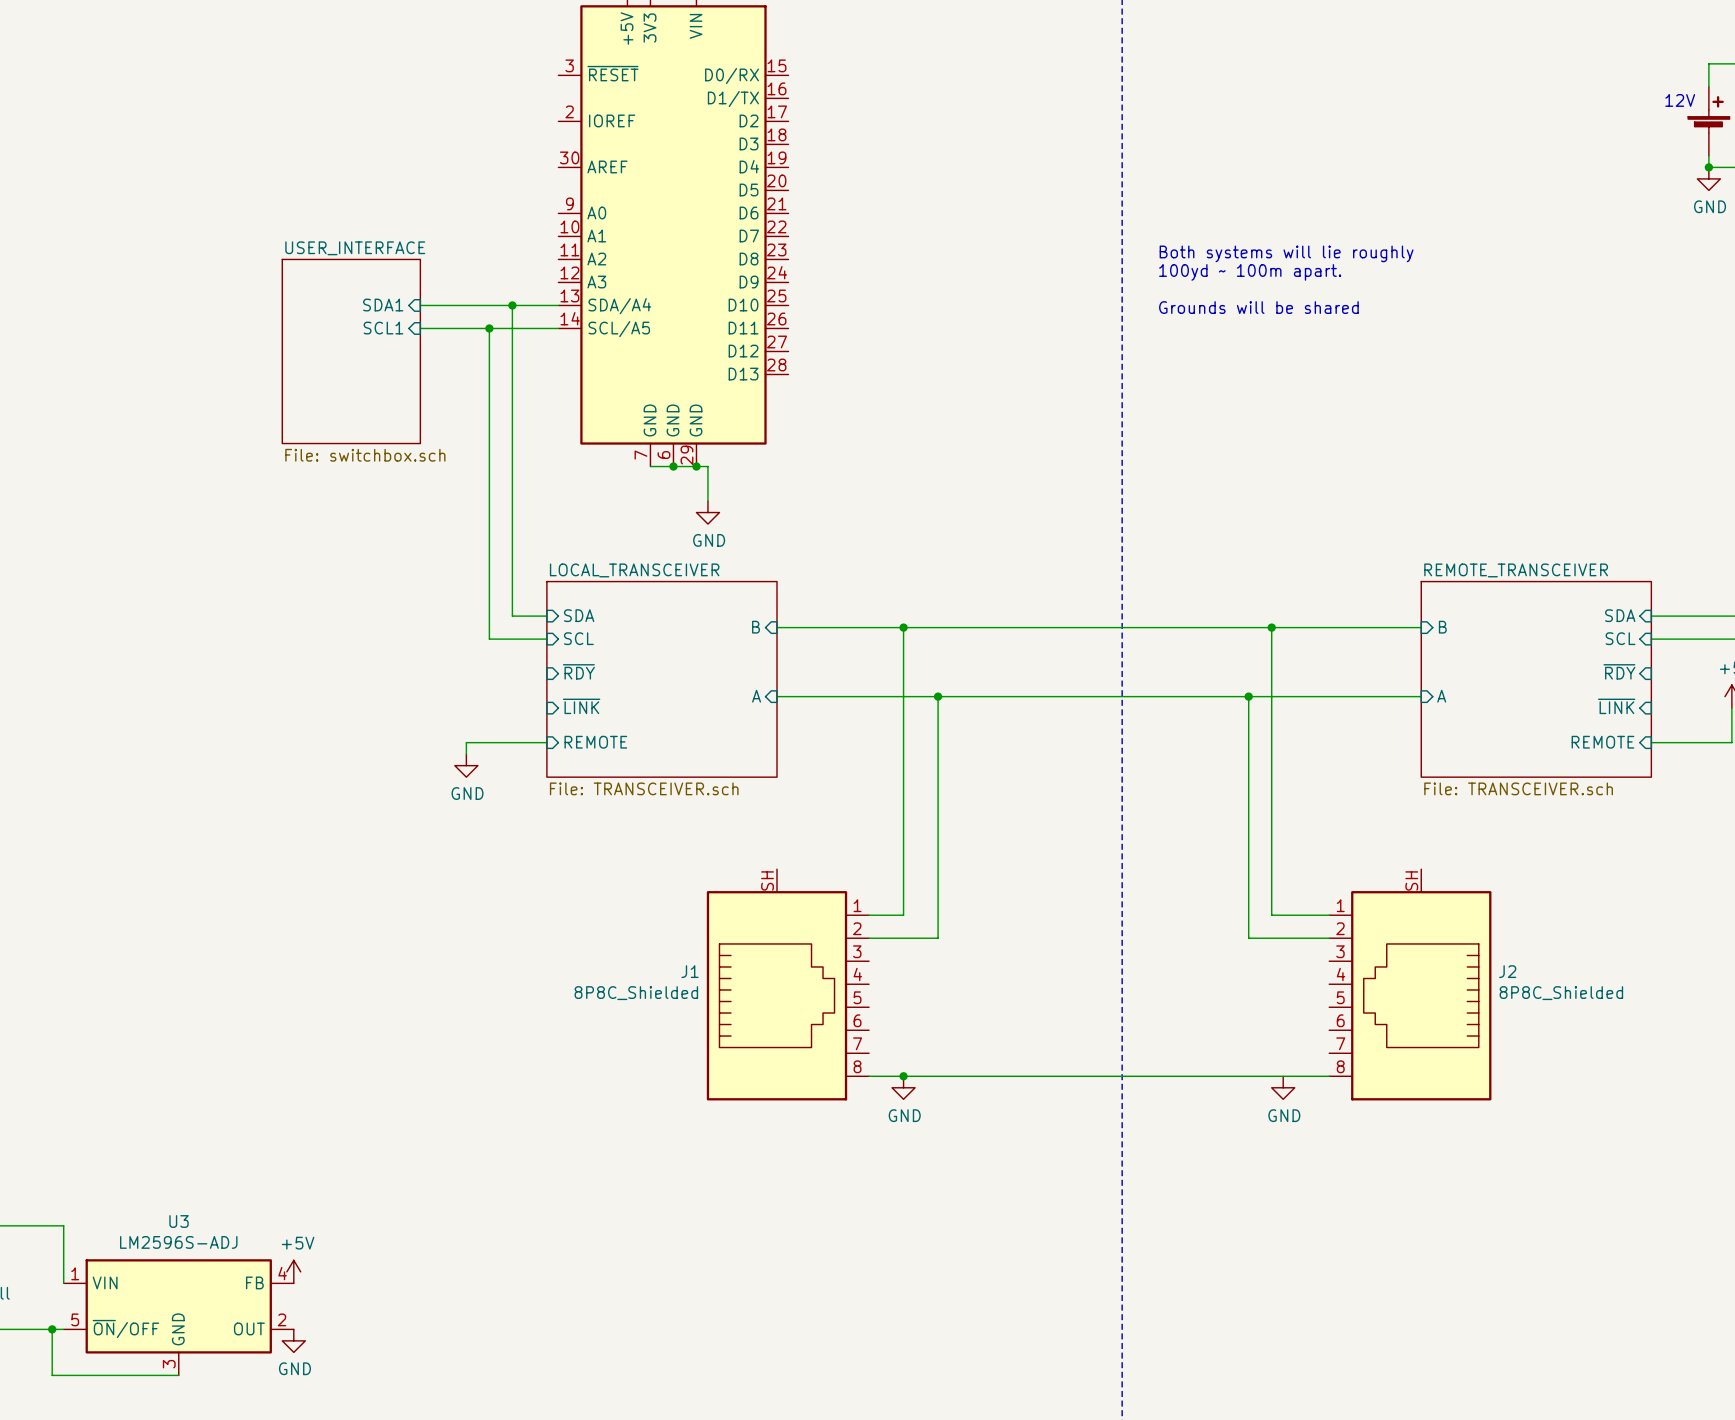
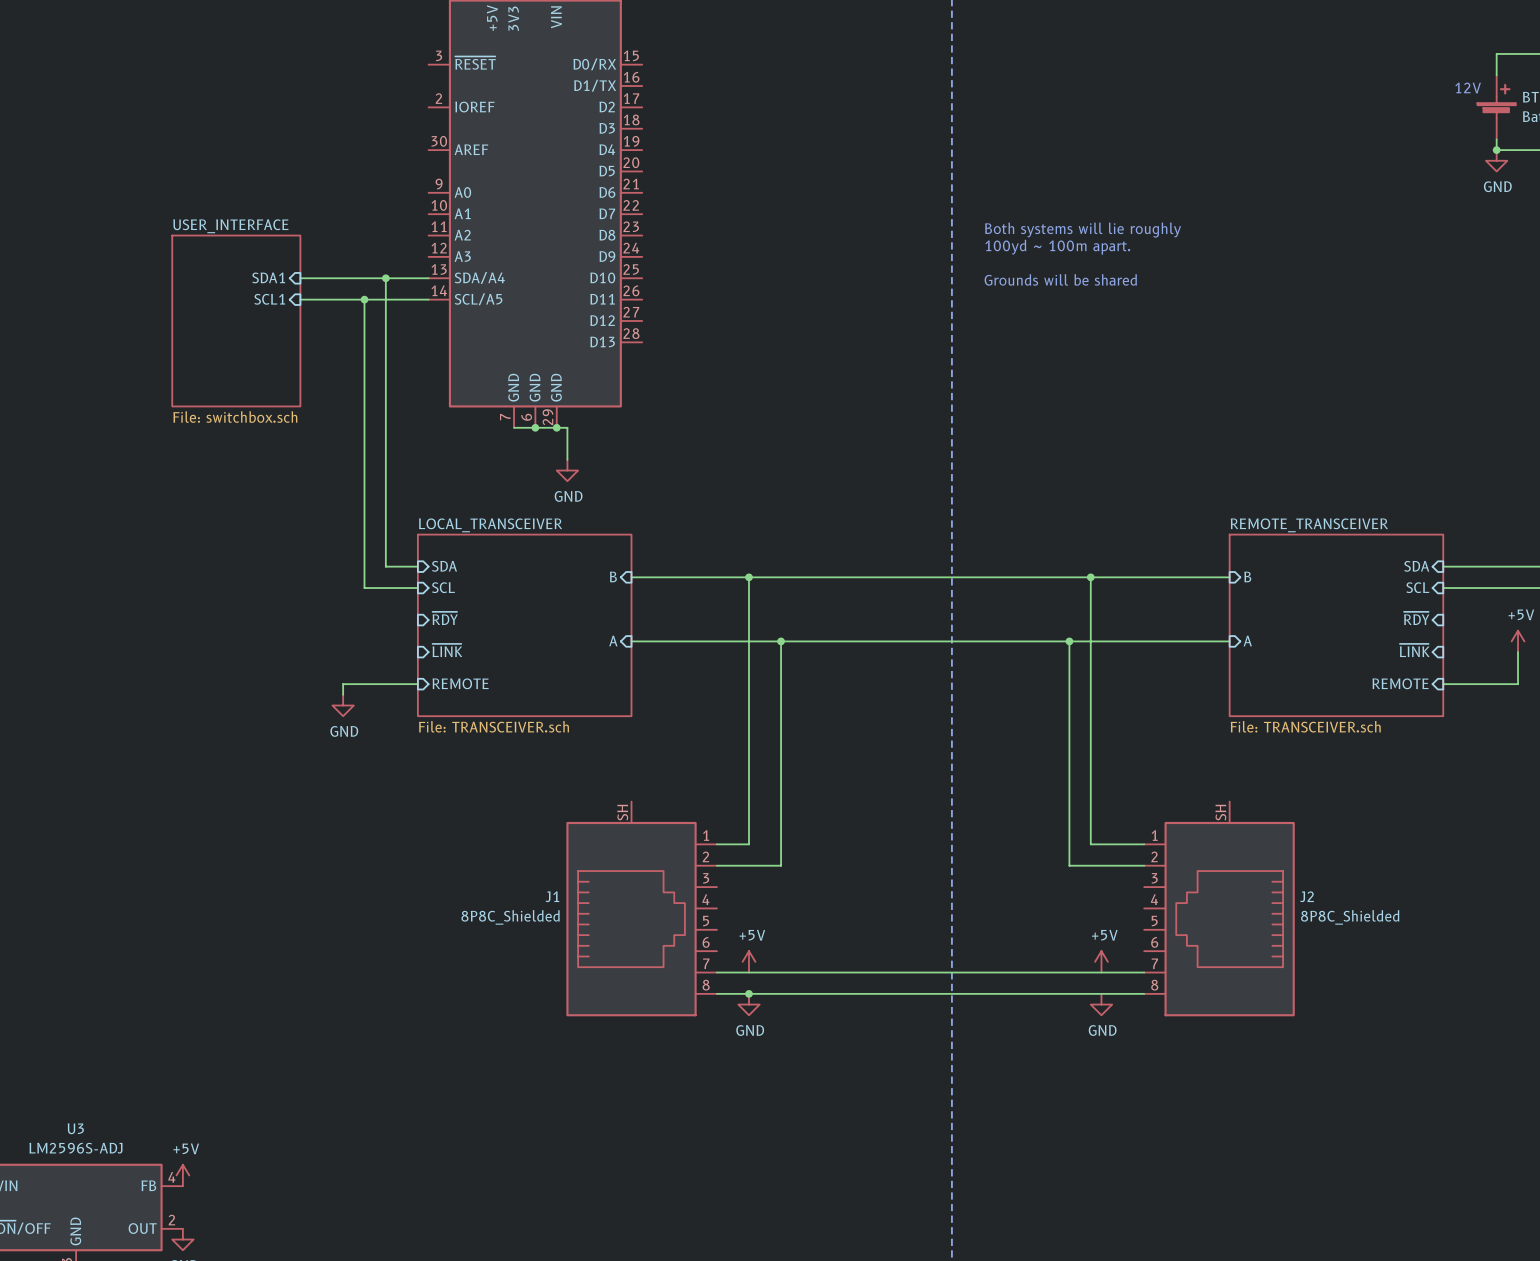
power symbol: none -> +5V (749, 961)
power symbol: none -> +5V (1101, 961)
wire: none -> (716, 972) (1144, 972)

